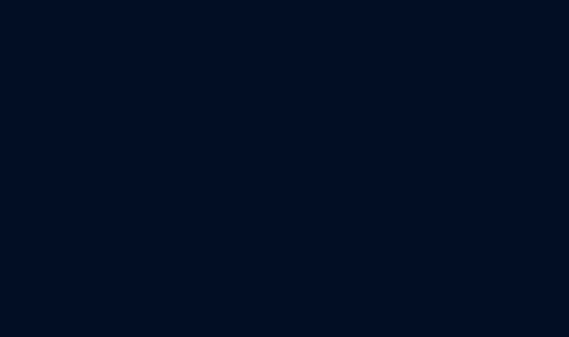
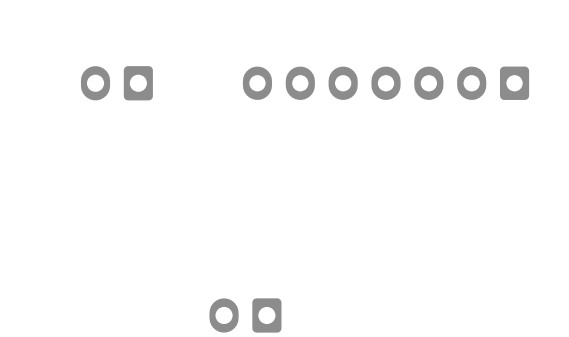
part: none -> (116, 83)
part: none -> (386, 83)
part: none -> (245, 315)

